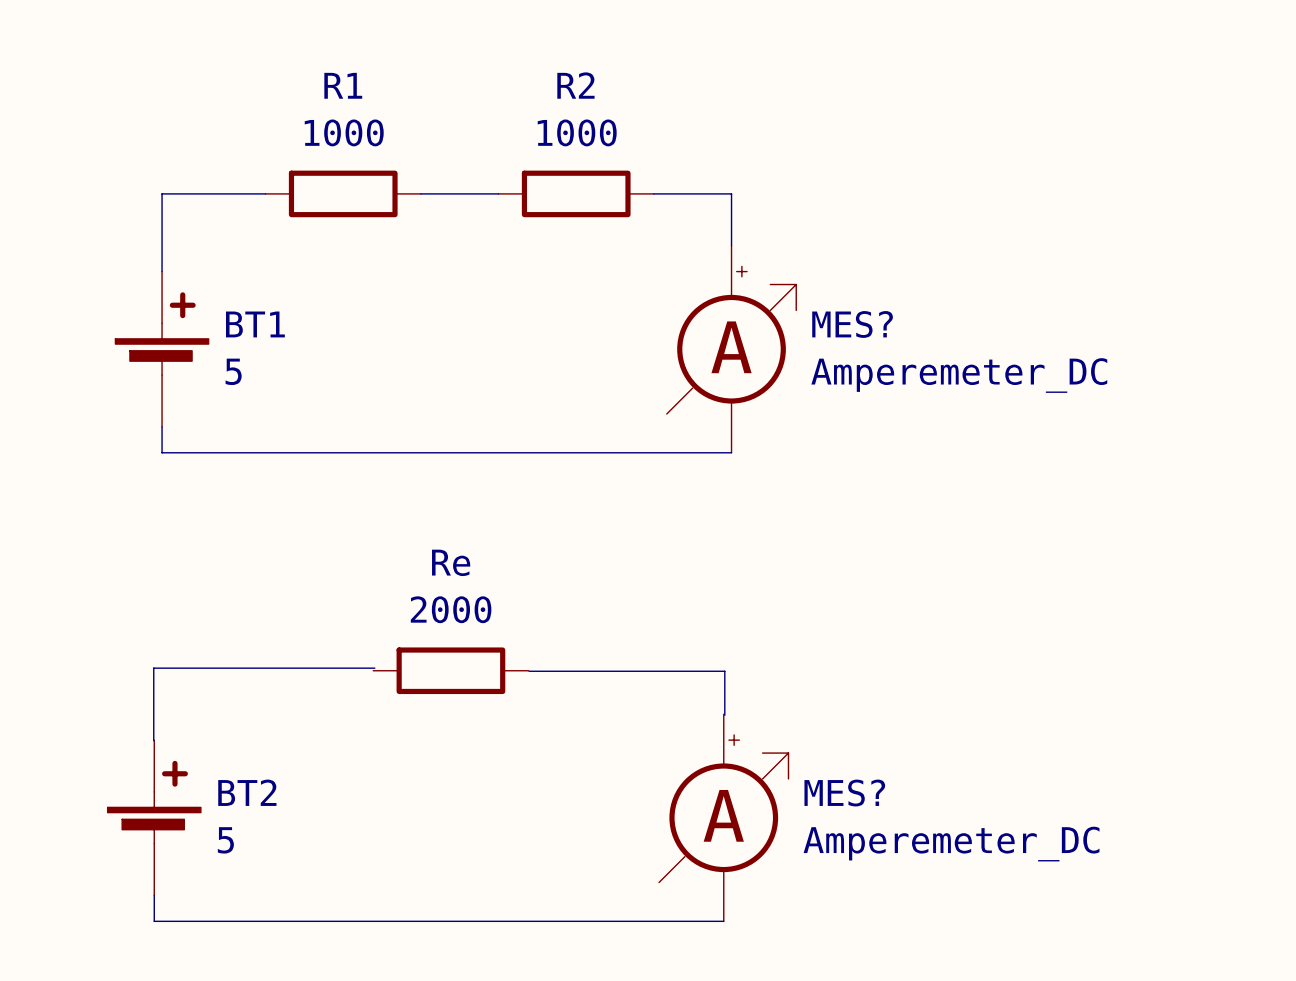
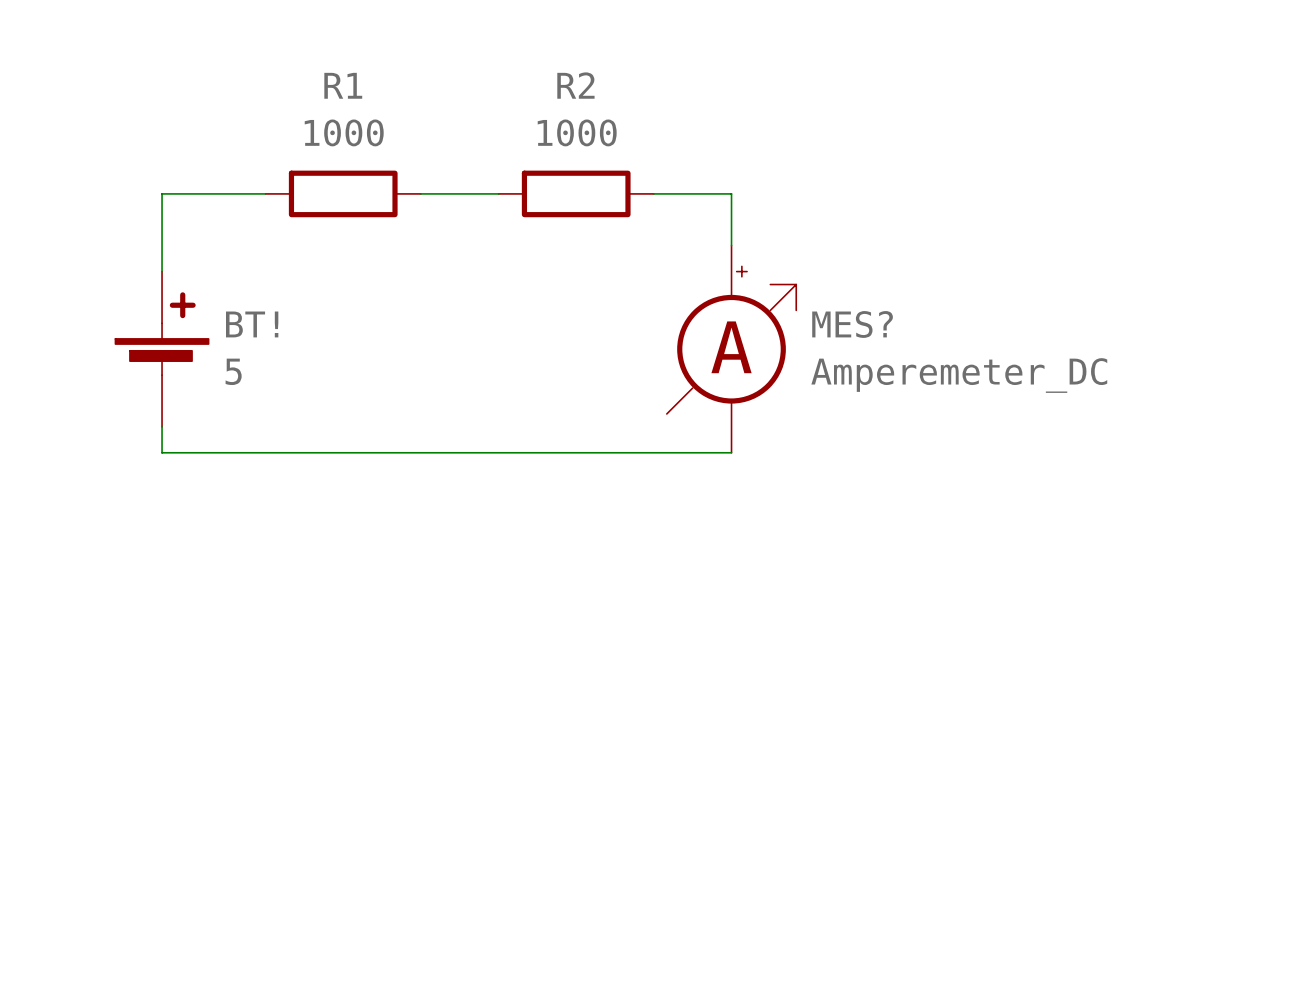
BT1 name: BT1 (255, 324) -> BT! (252, 324)
wire: (374, 668) (153, 668) (153, 740) -> none
Re: 2000 (450, 670) -> none
wire: (529, 671) (724, 671) (724, 715) -> none
BT2: 5 (154, 817) -> none
MES?: Amperemeter_DC (723, 817) -> none
wire: (154, 895) (154, 921) (723, 921) -> none

